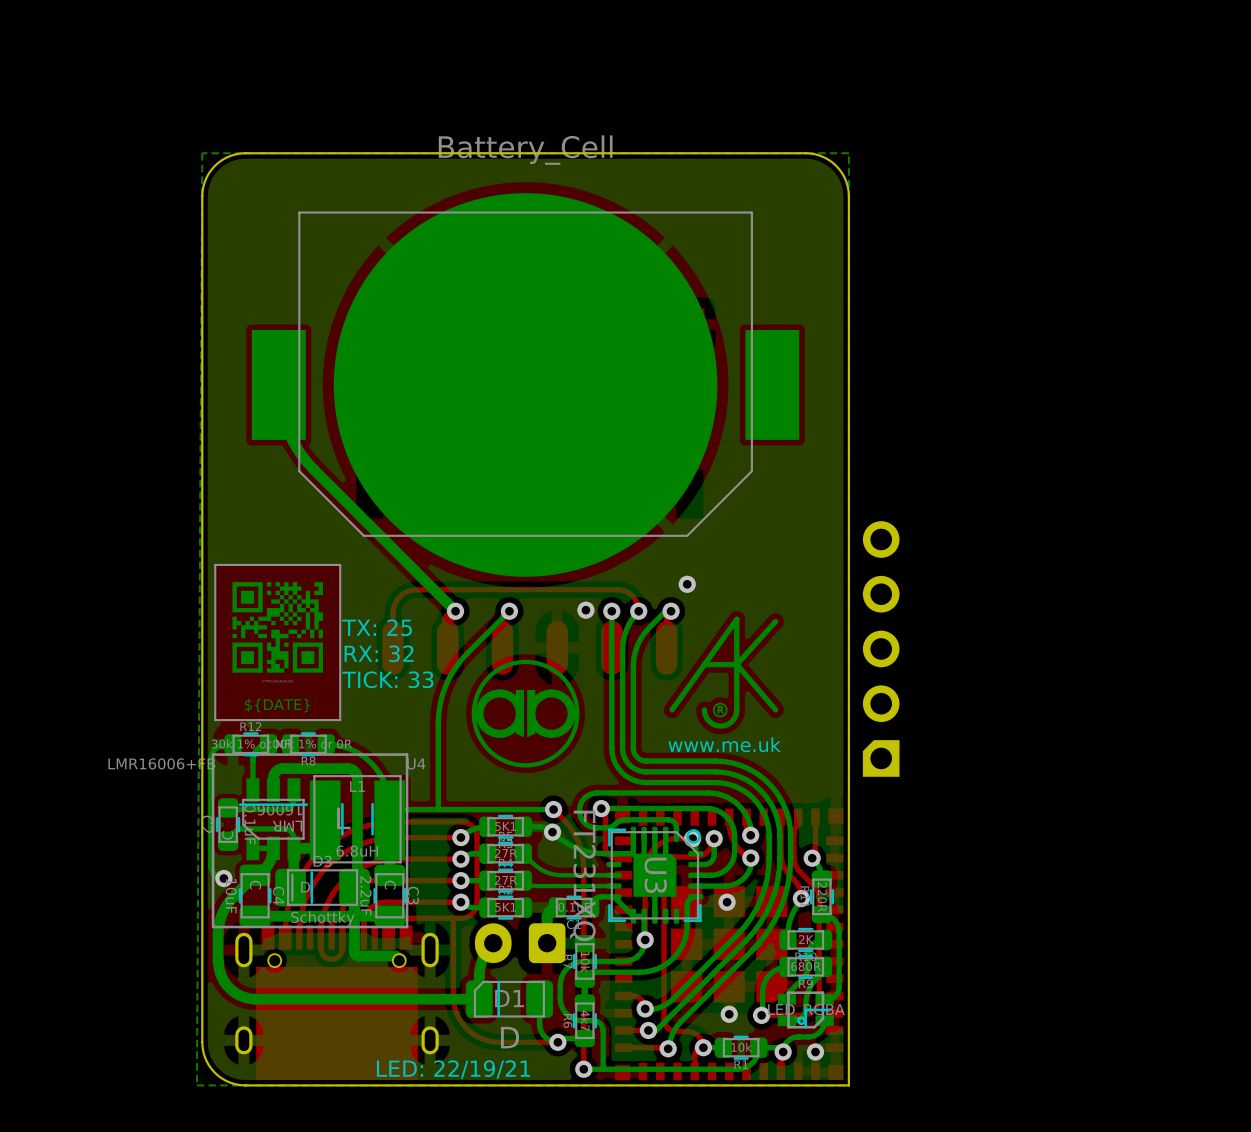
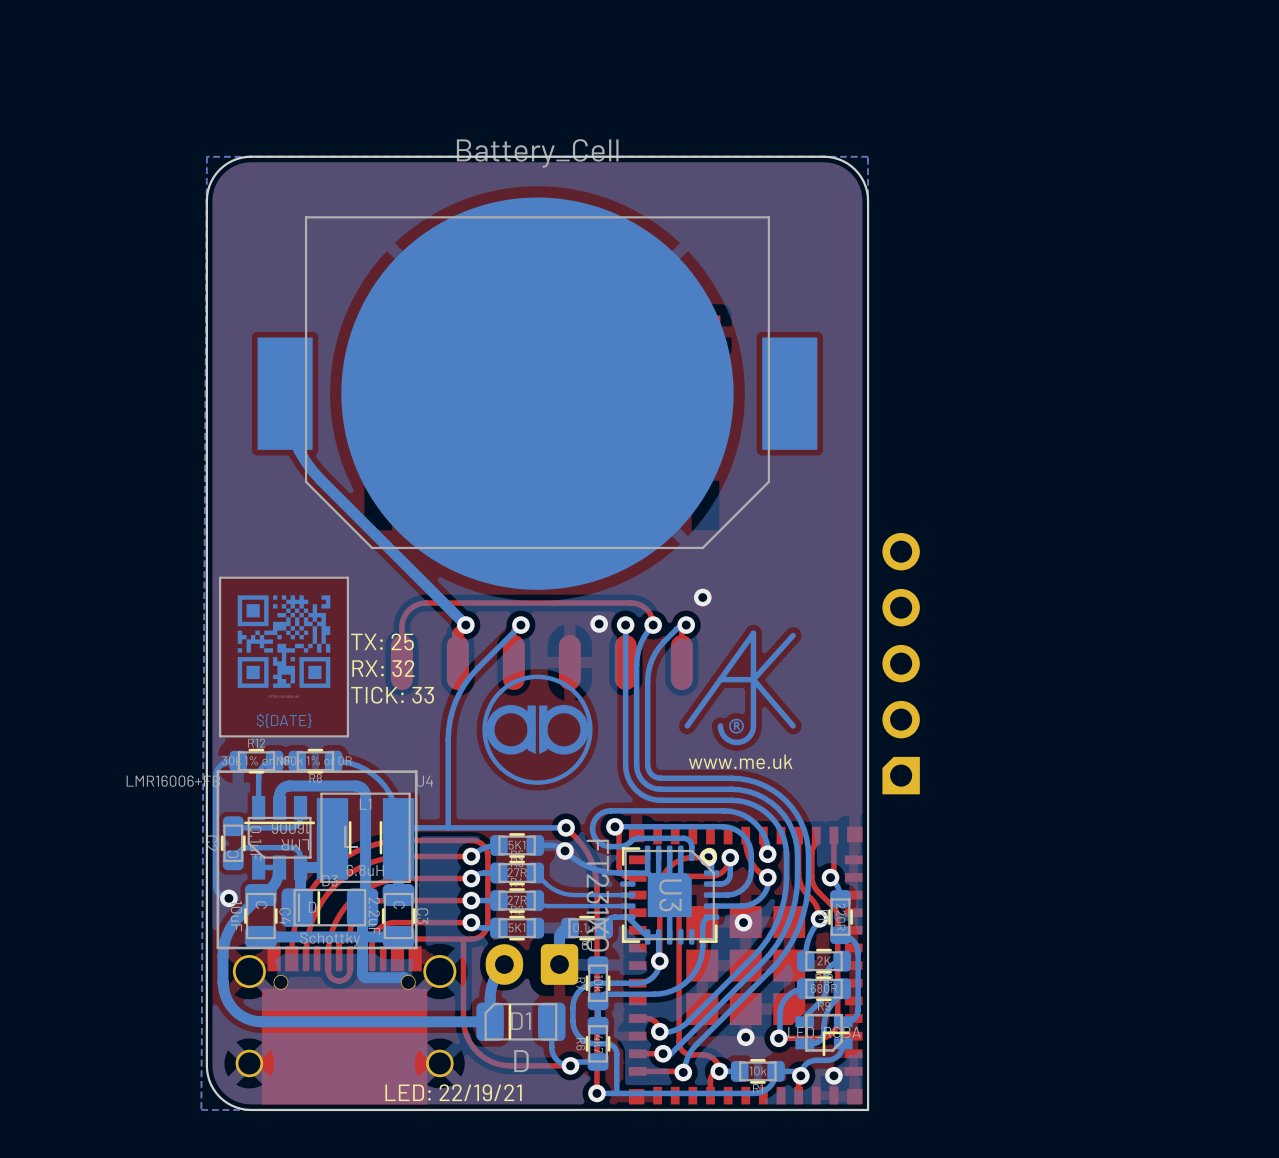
part footprint: [235, 925, 439, 1081] -> [232, 946, 457, 1105]
part footprint: [777, 991, 834, 1029] -> [795, 1013, 853, 1057]

